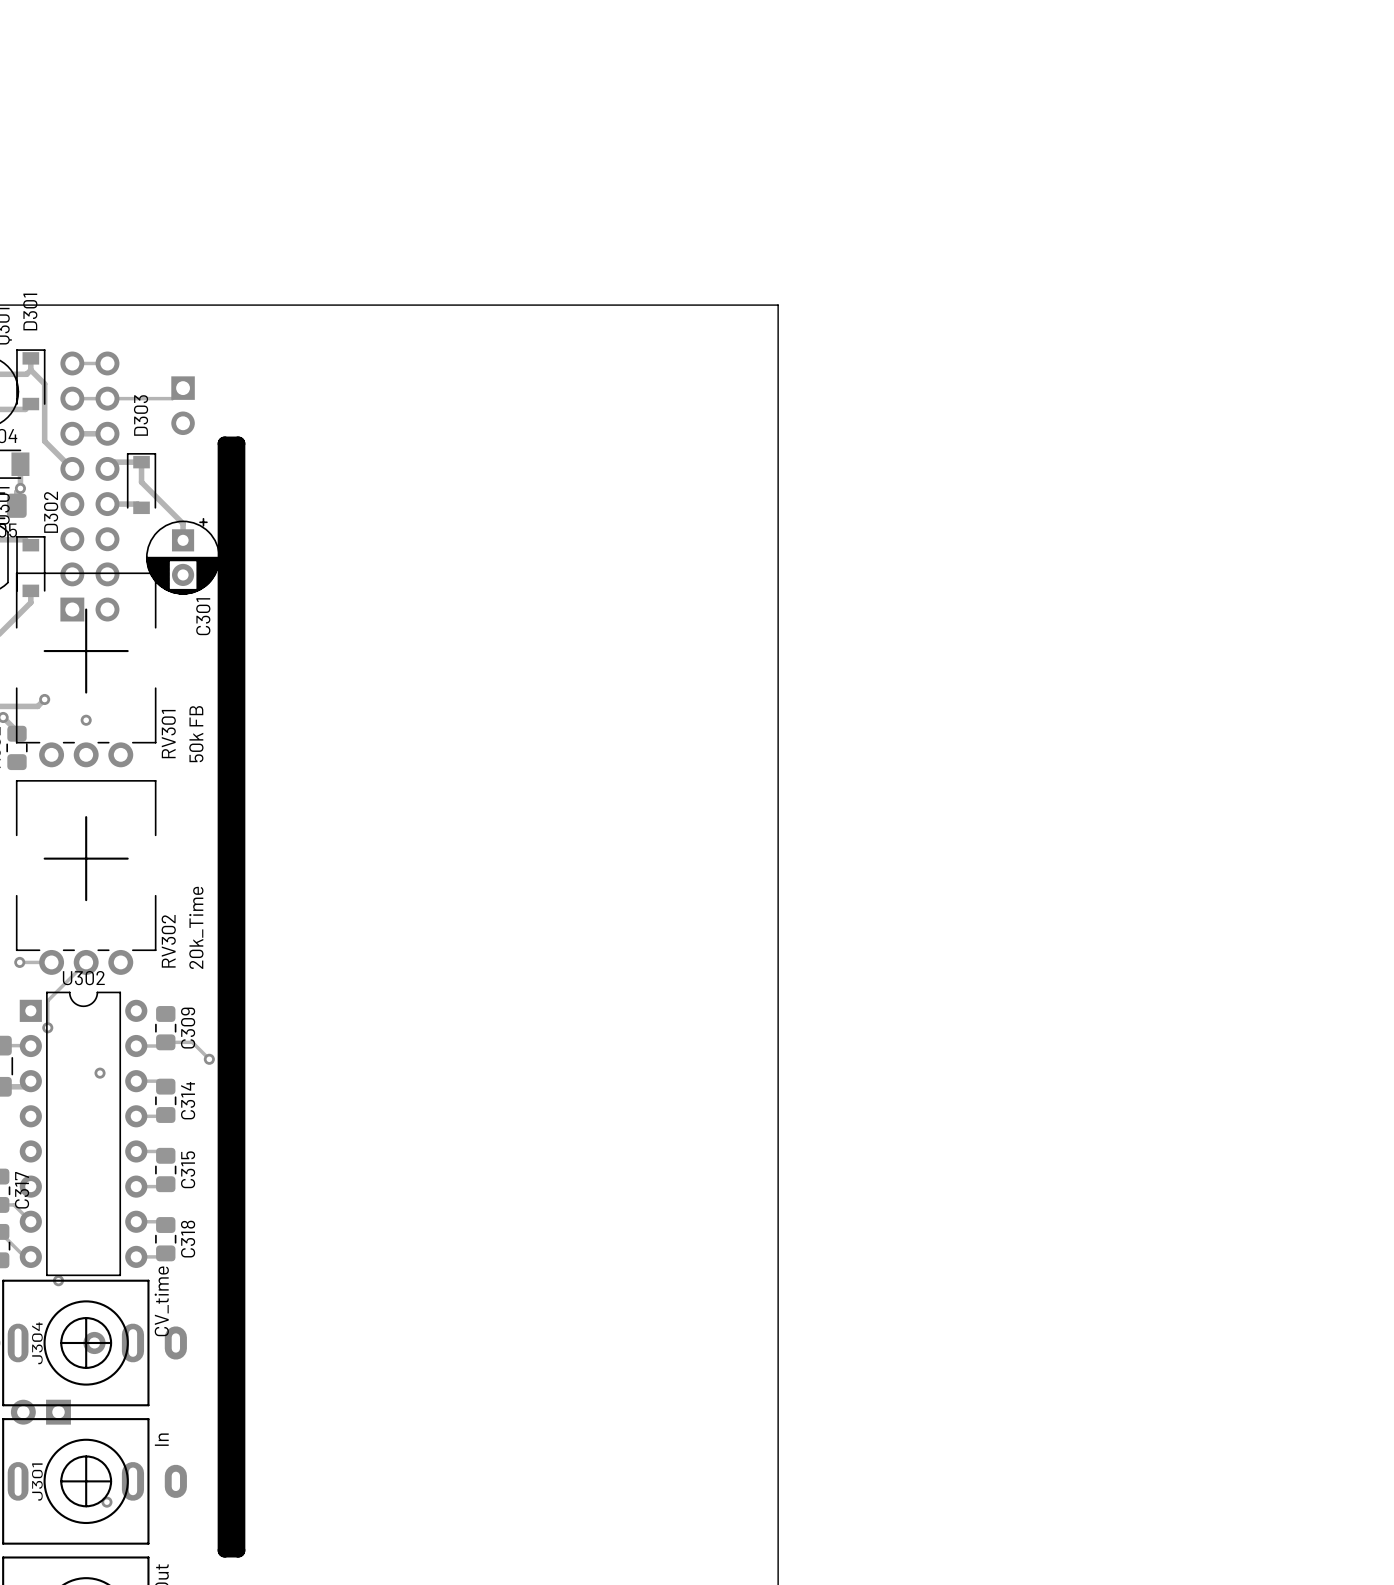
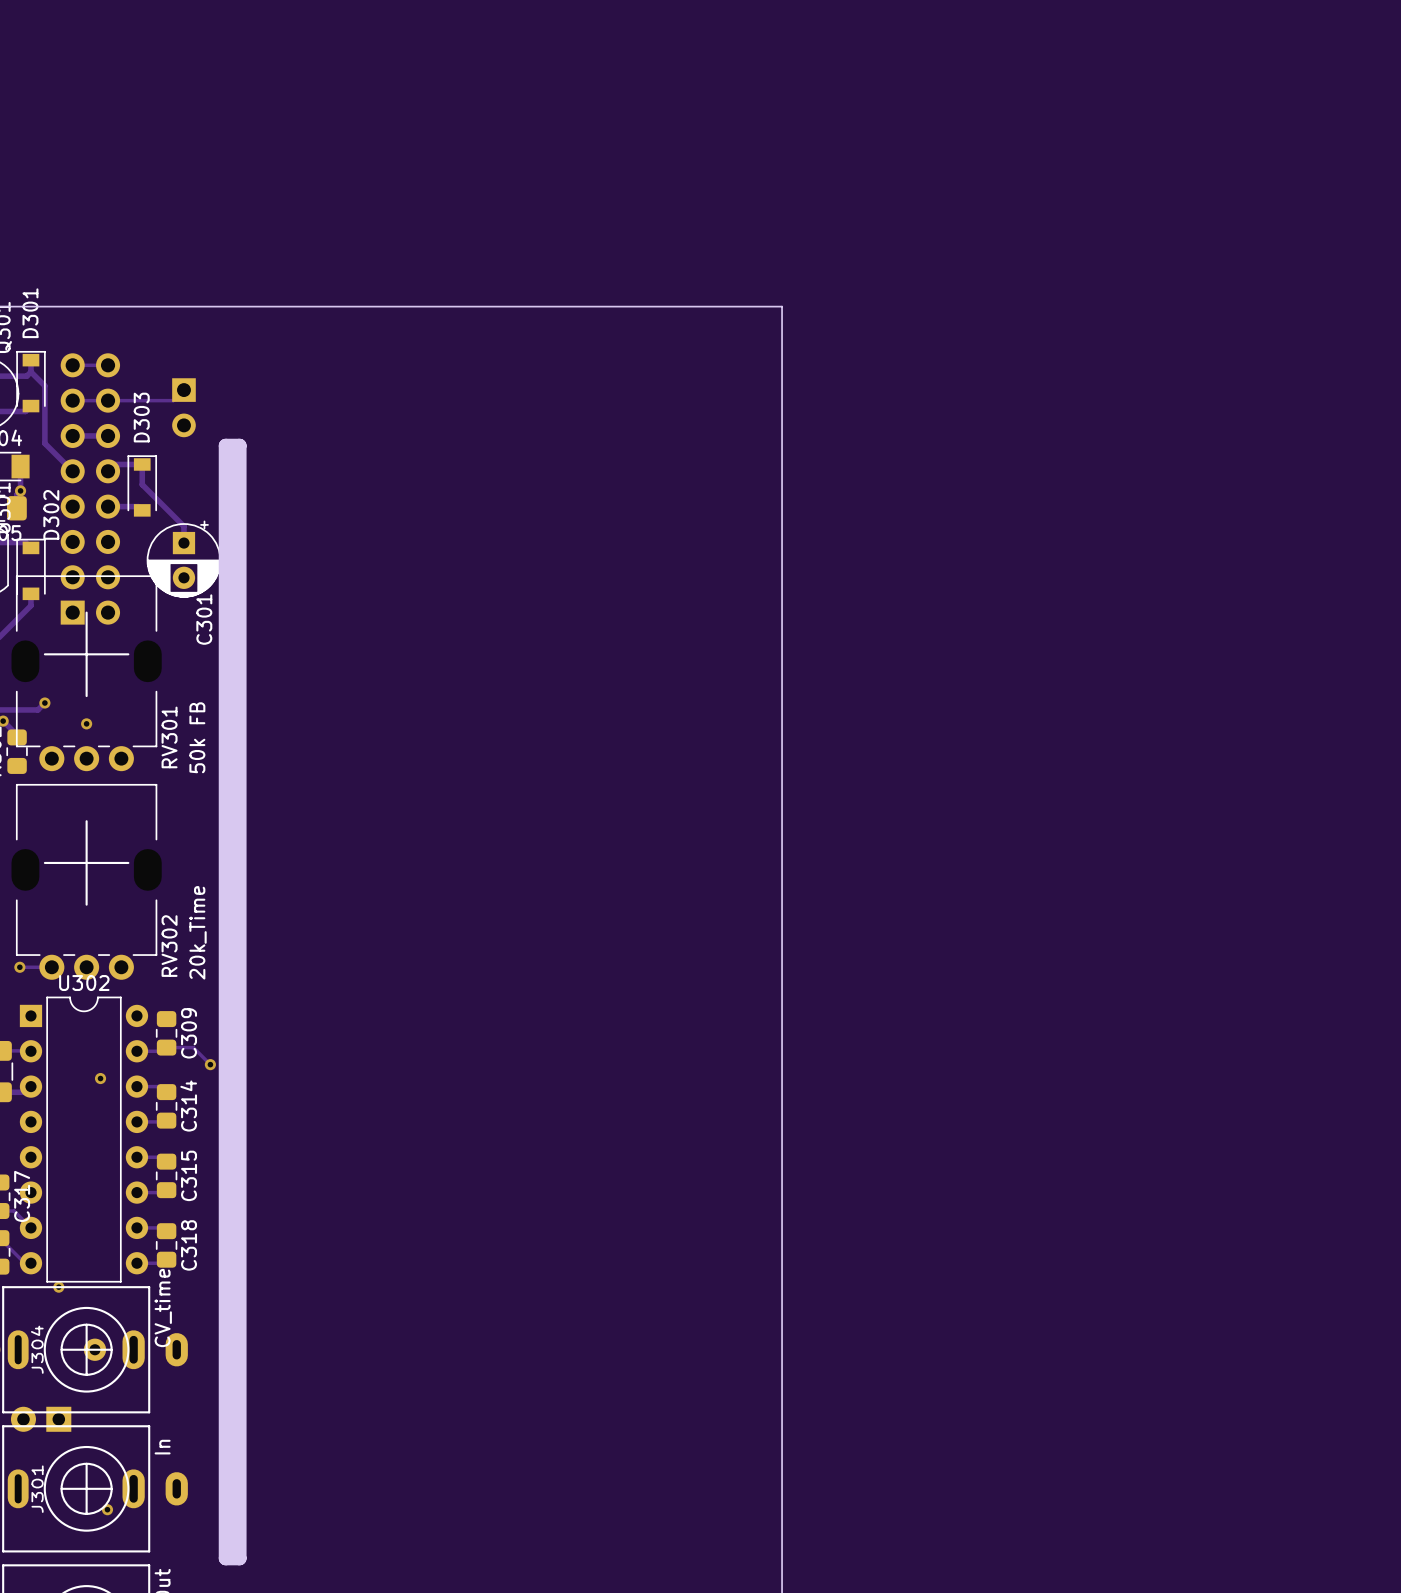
track: (86, 962) (47, 1000) (47, 1027) -> none
via: (47, 1027) -> none

